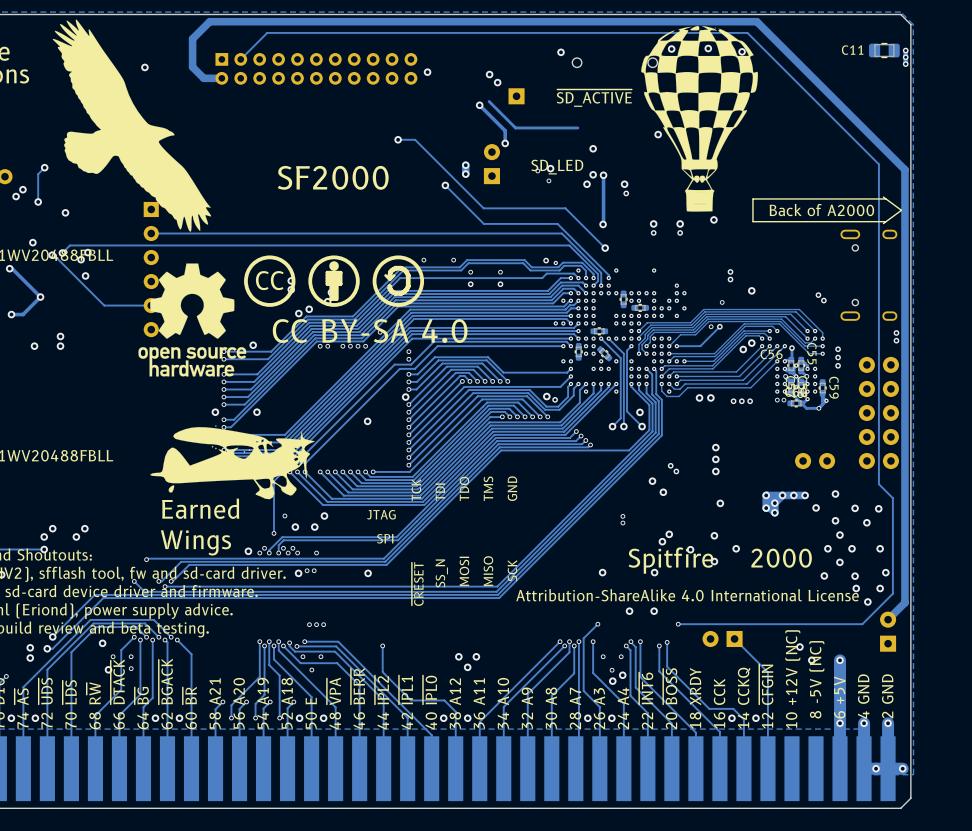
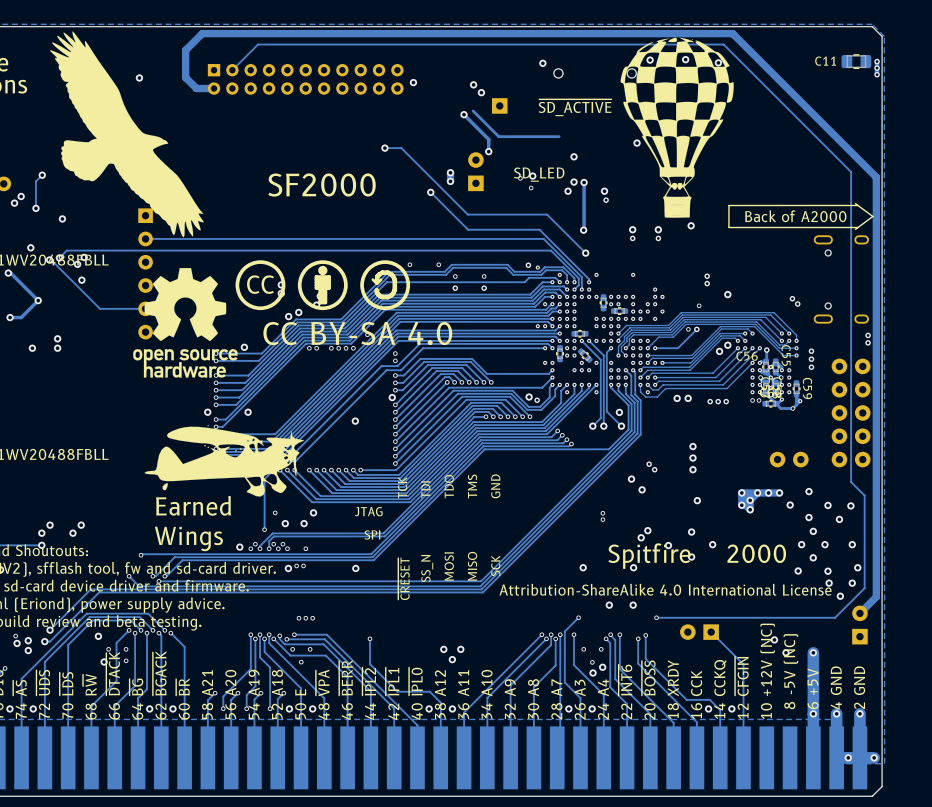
via: none -> (15, 636)
via: none -> (17, 643)

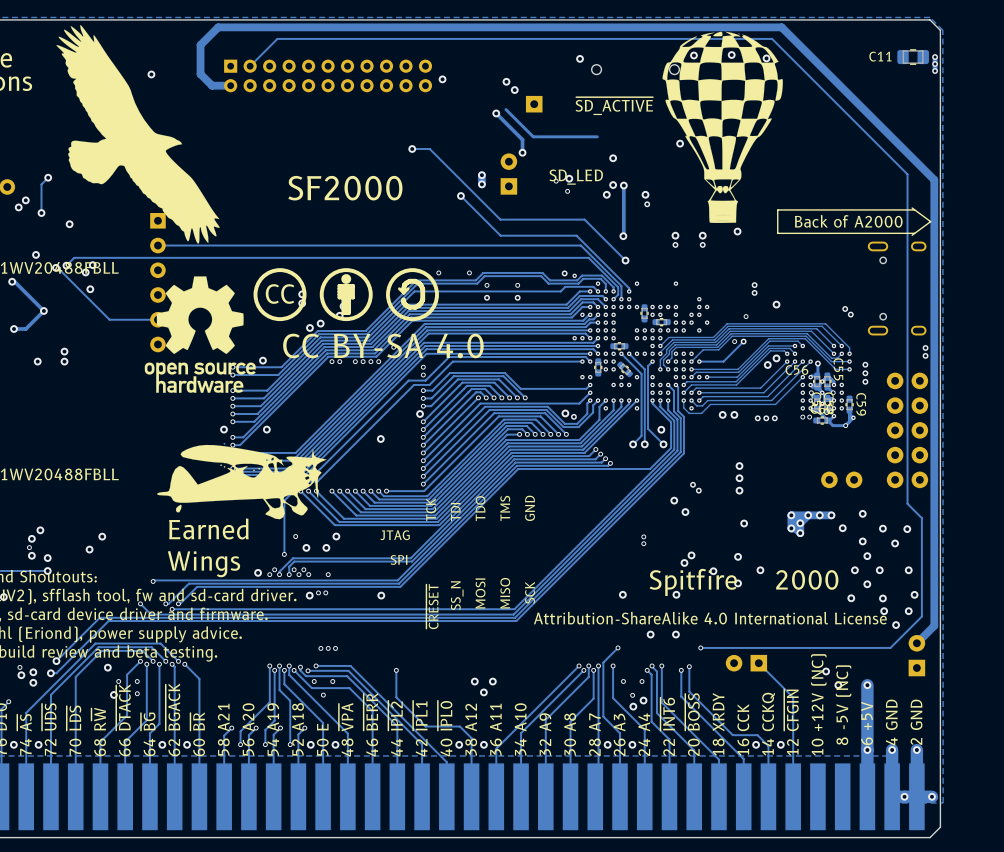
via: none -> (40, 530)
via: none -> (102, 536)
via: none -> (31, 538)
via: none -> (29, 547)
via: (50, 525) -> none
via: none -> (31, 555)
via: (72, 533) -> none

